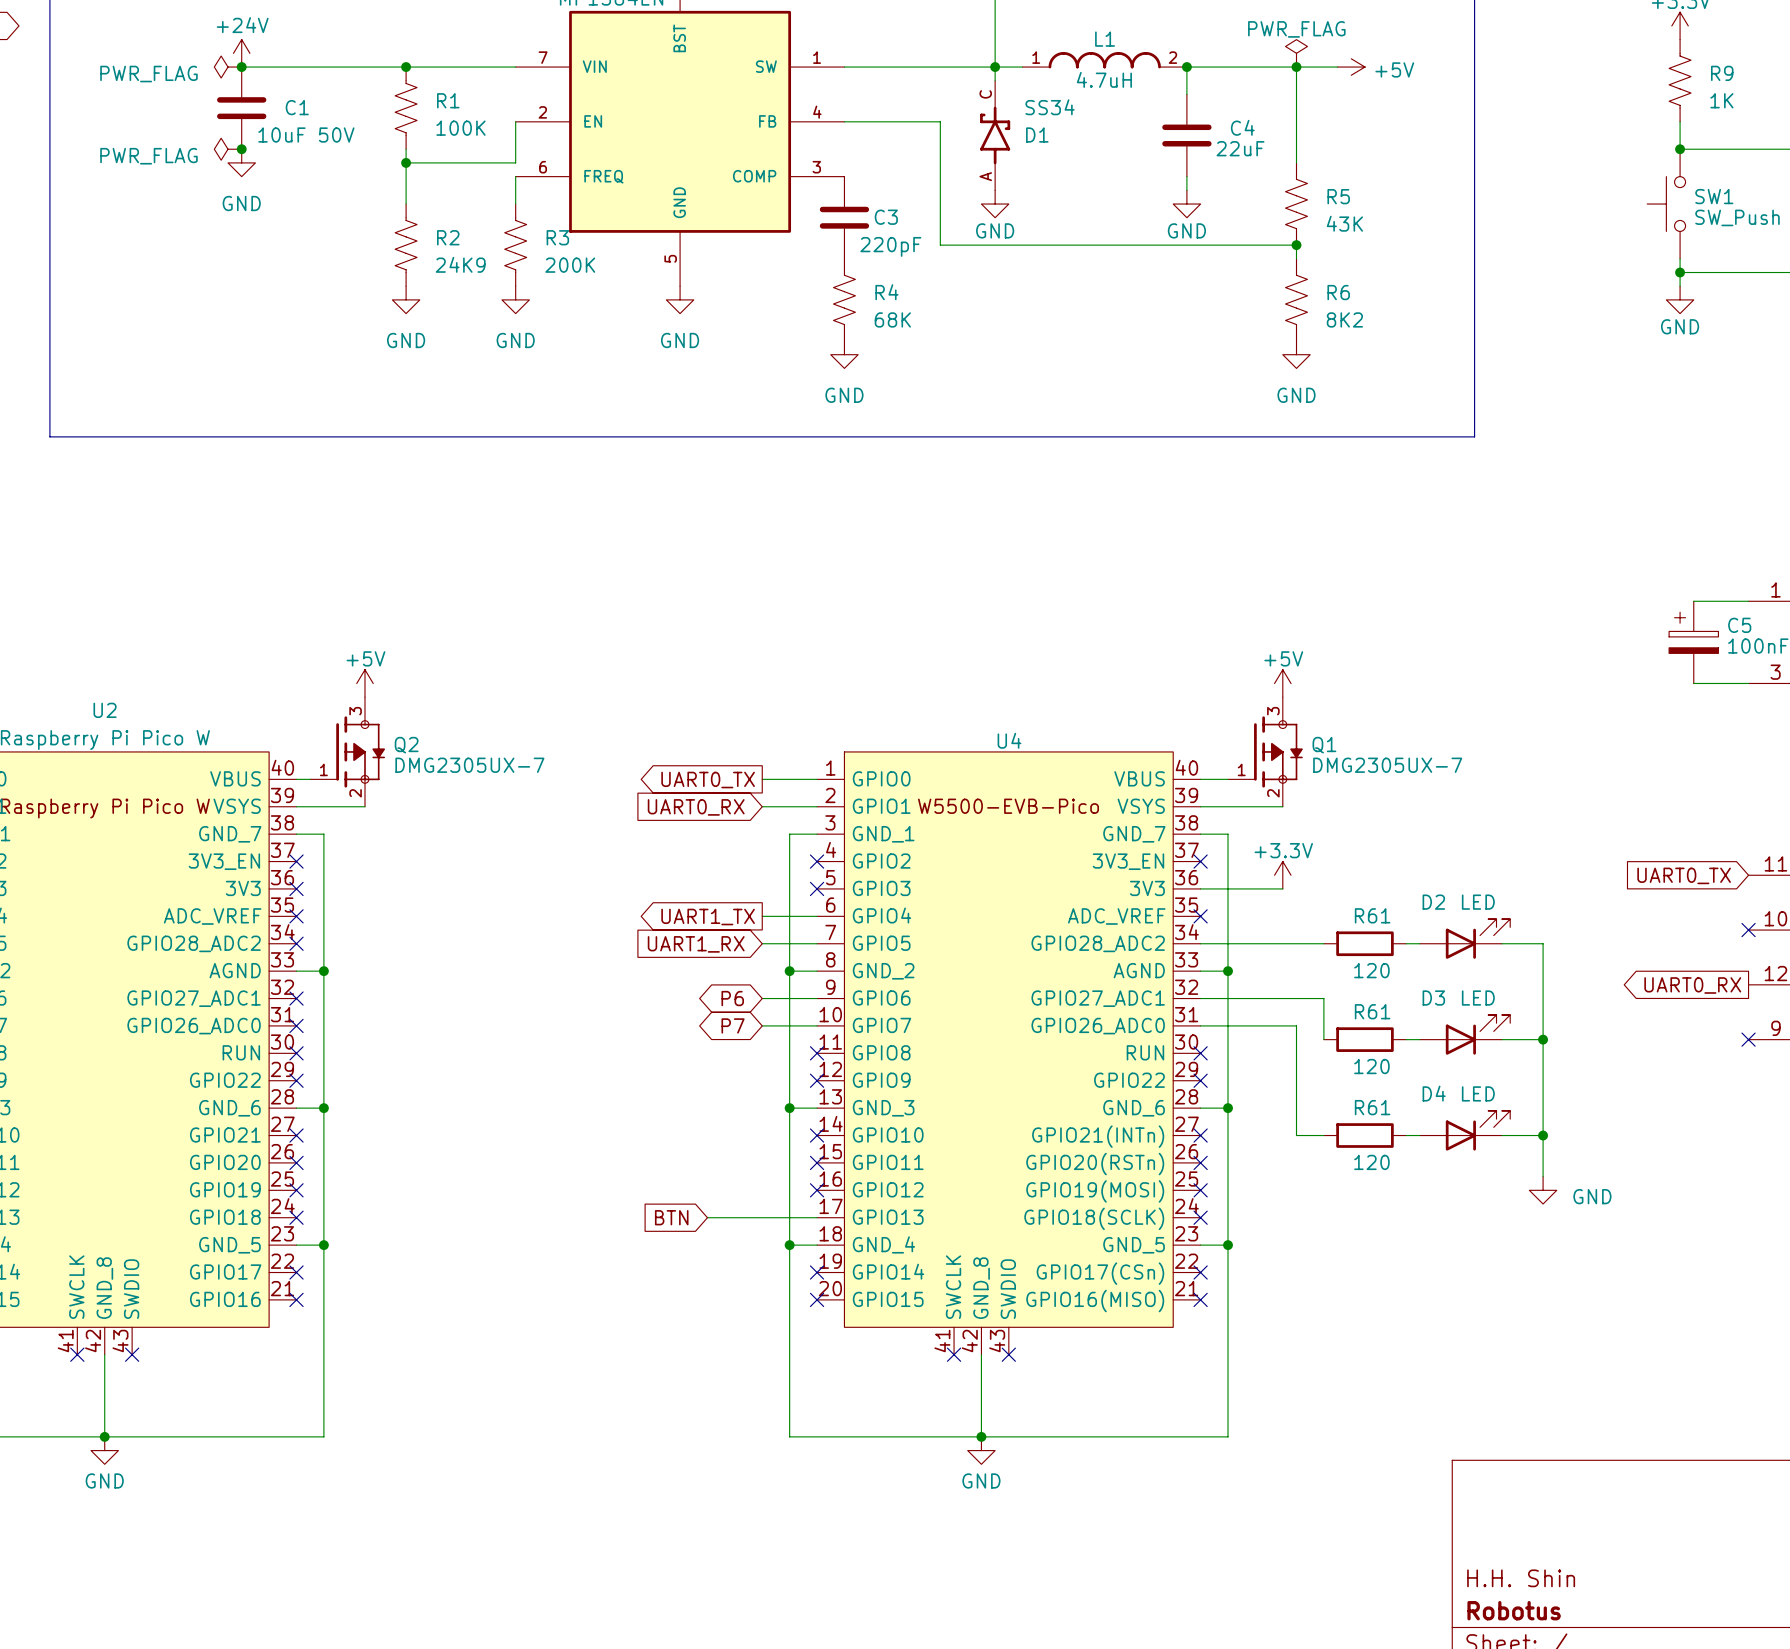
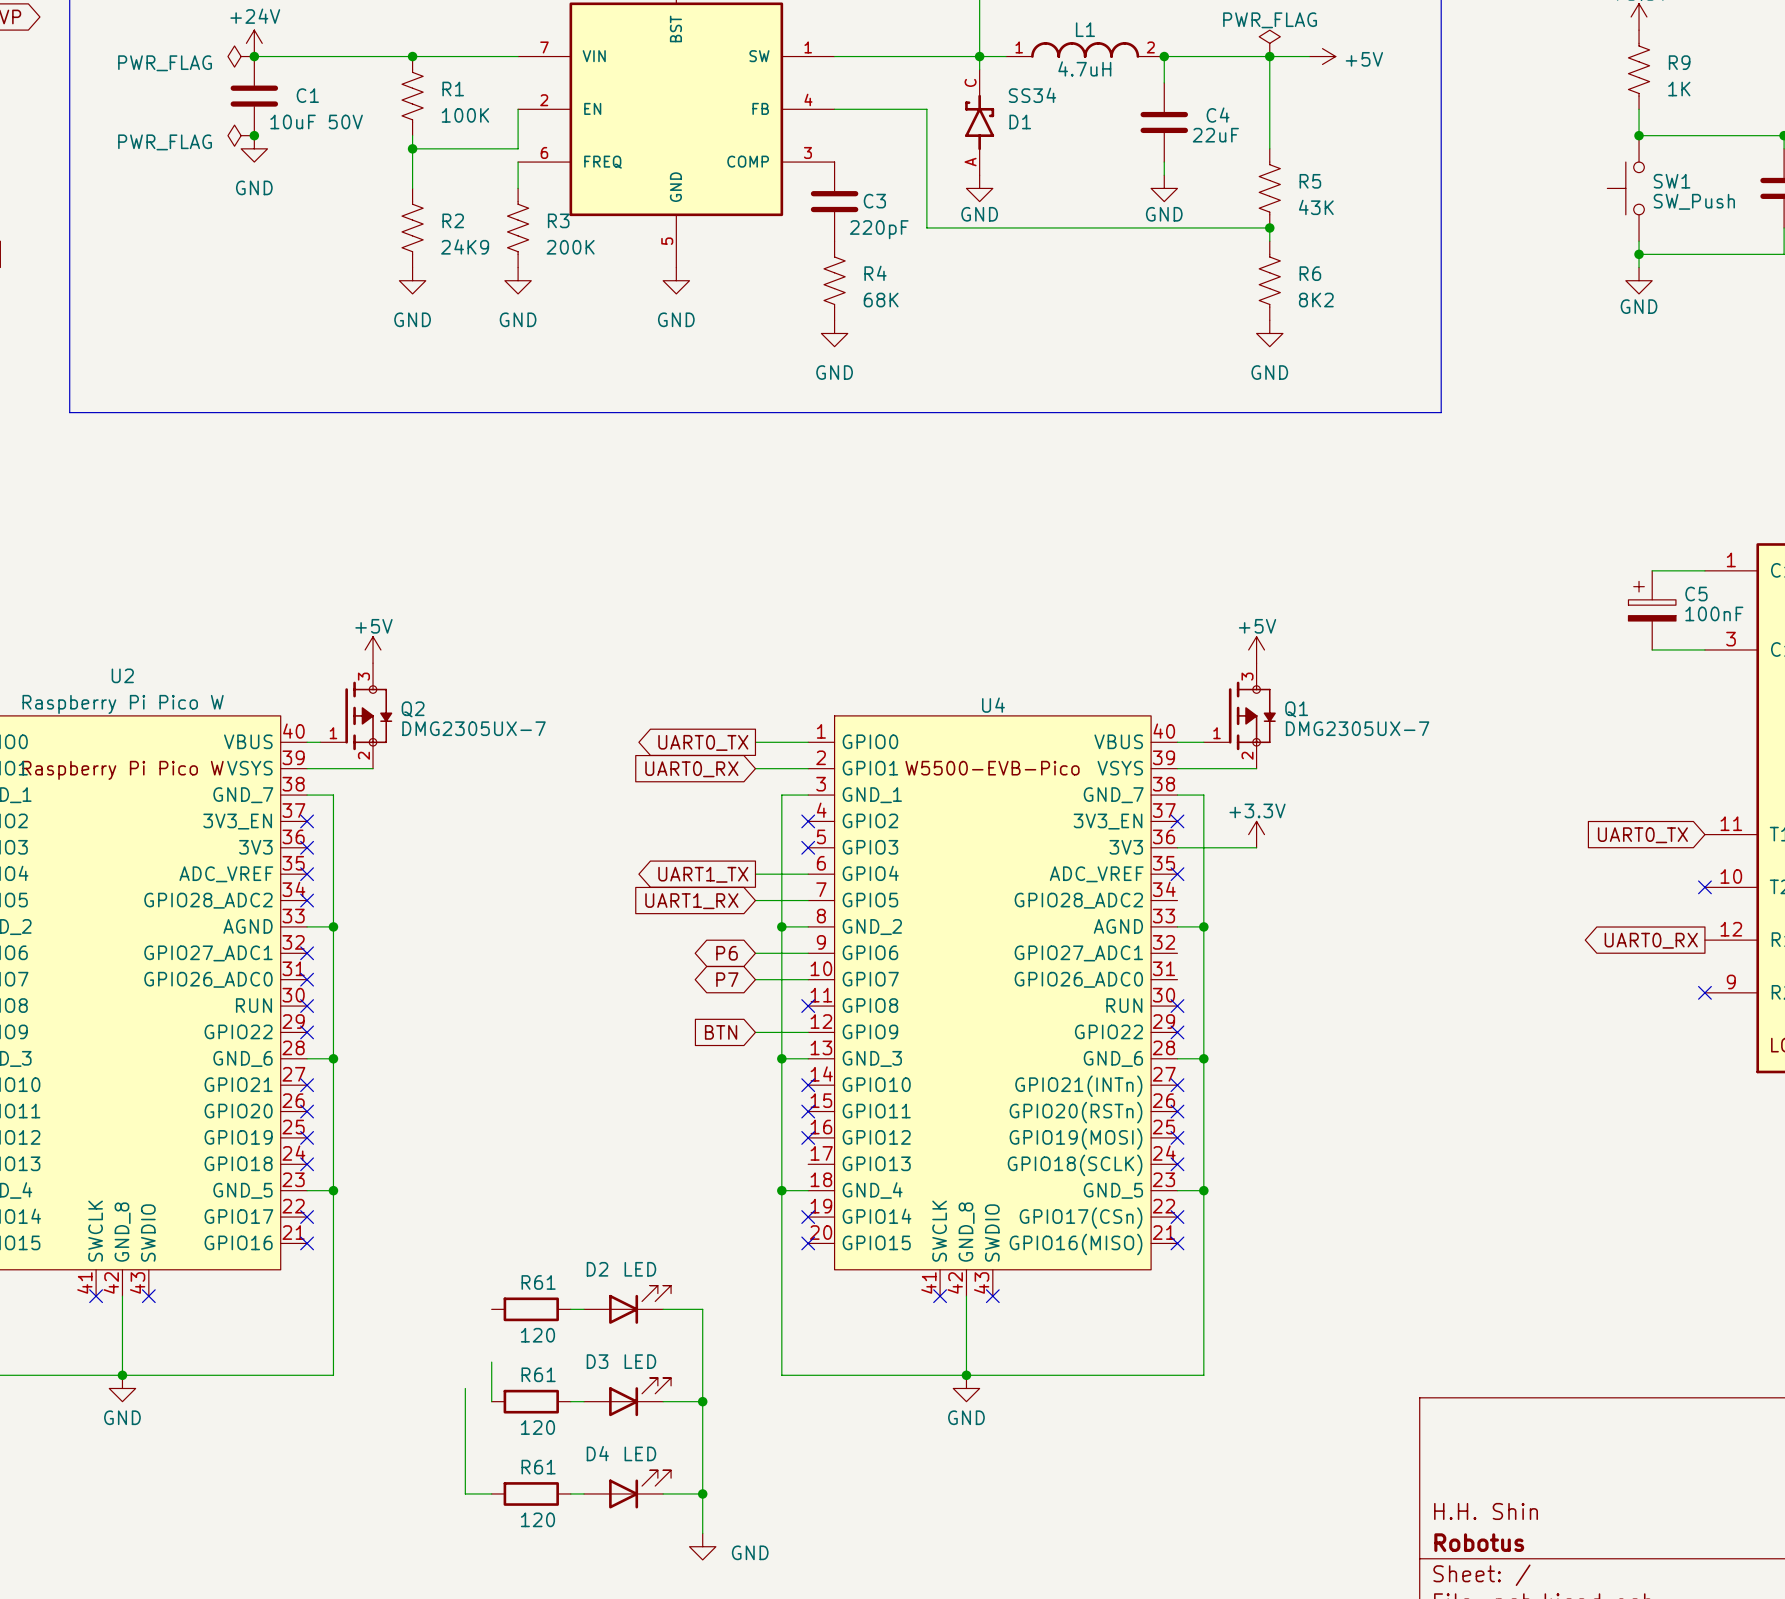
D2 position: (1464, 938) -> (627, 1304)
wire: (1200, 943) (1323, 943) -> none
R61: 120 (1364, 943) -> none
wire: (1406, 943) (1419, 943) -> none
wire: (1501, 943) (1543, 943) (1543, 1176) -> none
wire: (1200, 998) (1323, 998) (1323, 1039) -> none
wire: (1200, 1025) (1296, 1025) (1296, 1135) (1323, 1135) -> none
D3 position: (1464, 1034) -> (627, 1397)
R61: 120 (1364, 1039) -> none
wire: (1406, 1039) (1419, 1039) -> none
wire: (1501, 1039) (1543, 1039) -> none
junction: (1543, 1039) -> none
wire: none -> (755, 1032) (808, 1032)
no-connect mark: (817, 1080) -> none
D4 position: (1464, 1130) -> (627, 1489)
R61: 120 (1364, 1135) -> none
wire: (1406, 1135) (1419, 1135) -> none
wire: (1501, 1135) (1543, 1135) -> none
junction: (1543, 1135) -> none
power symbol: GND (1543, 1190) -> none
global label position: BTN (671, 1217) -> BTN (721, 1032)
wire: (707, 1217) (817, 1217) -> none
R61: none -> 120 (531, 1309)
wire: none -> (570, 1309) (584, 1309)
wire: none -> (663, 1309) (702, 1309) (702, 1533)
wire: none -> (491, 1362) (491, 1401)
wire: none -> (465, 1388) (465, 1493) (491, 1493)
R61: none -> 120 (531, 1401)
wire: none -> (570, 1401) (584, 1401)
wire: none -> (663, 1401) (702, 1401)
junction: none -> (702, 1401)
R61: none -> 120 (531, 1493)
wire: none -> (570, 1493) (584, 1493)
wire: none -> (663, 1493) (702, 1493)
junction: none -> (702, 1493)
power symbol: none -> GND (702, 1546)

